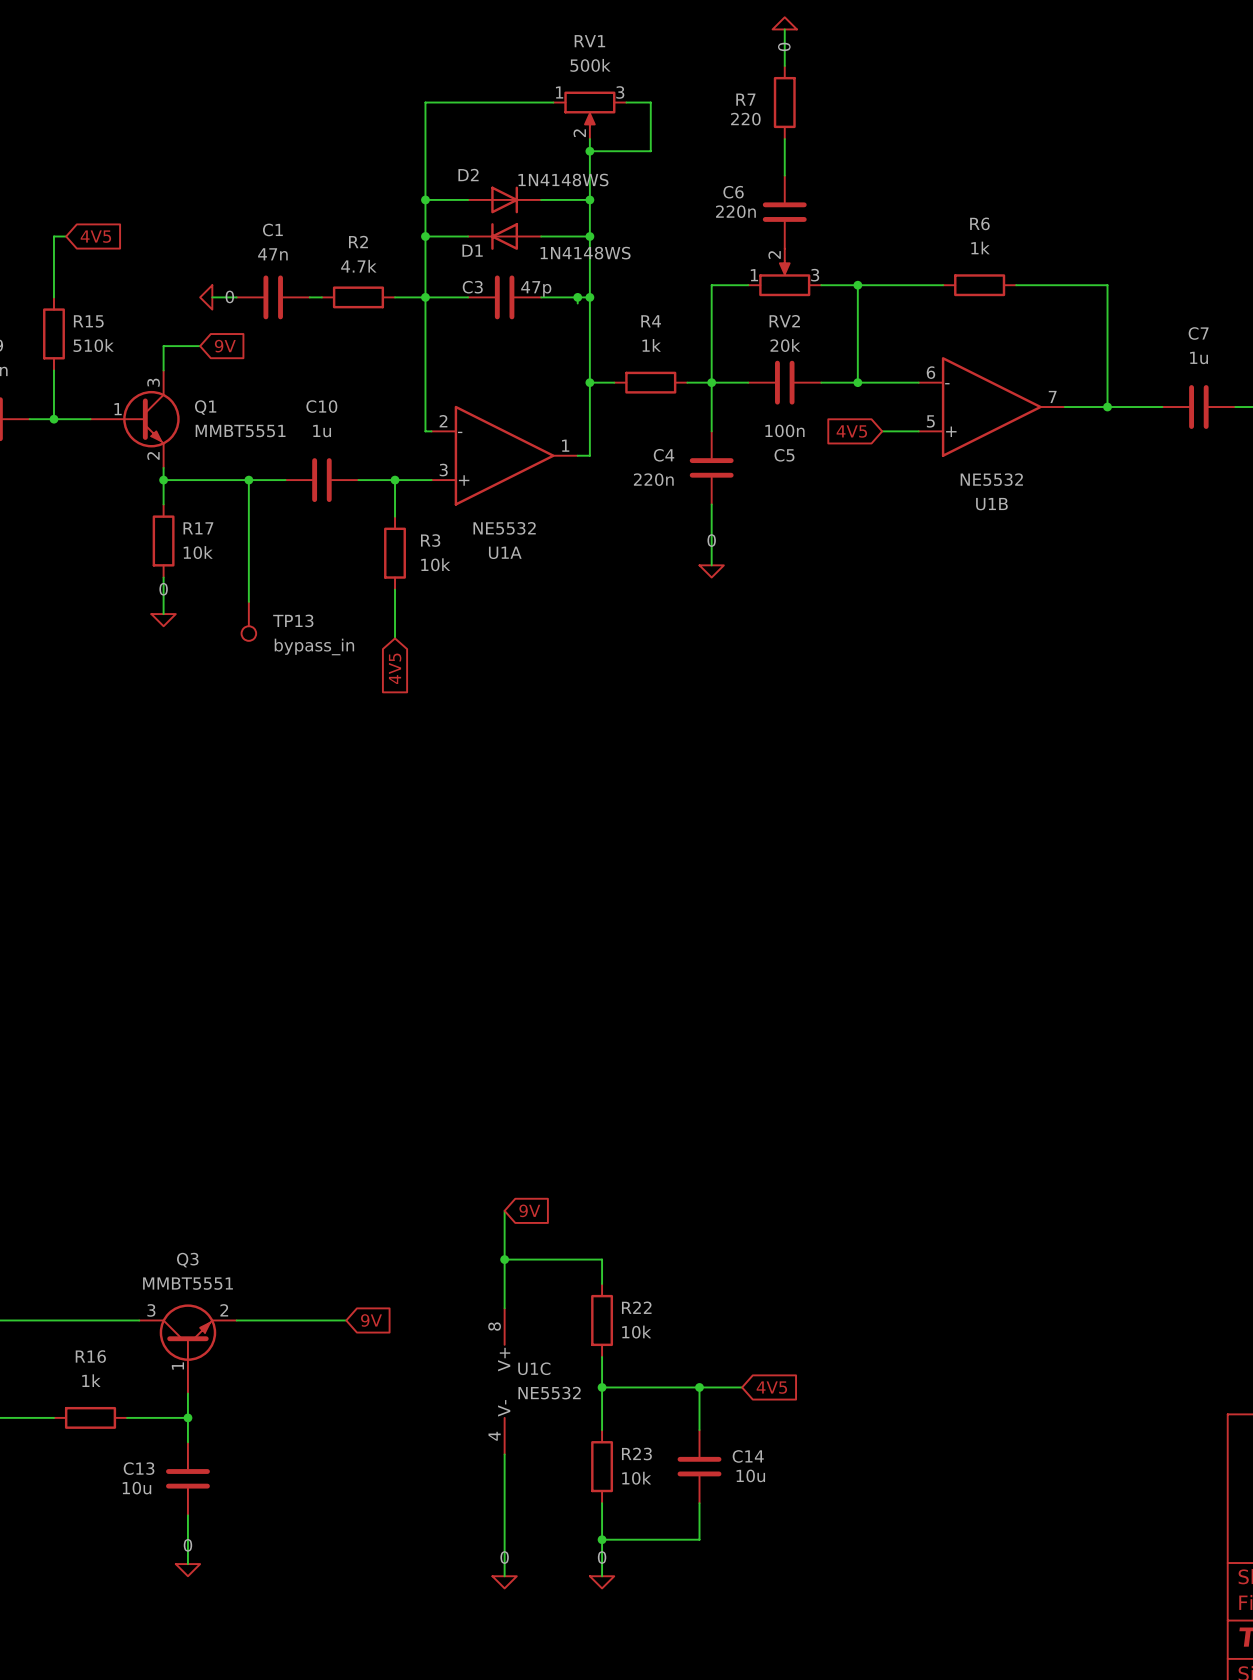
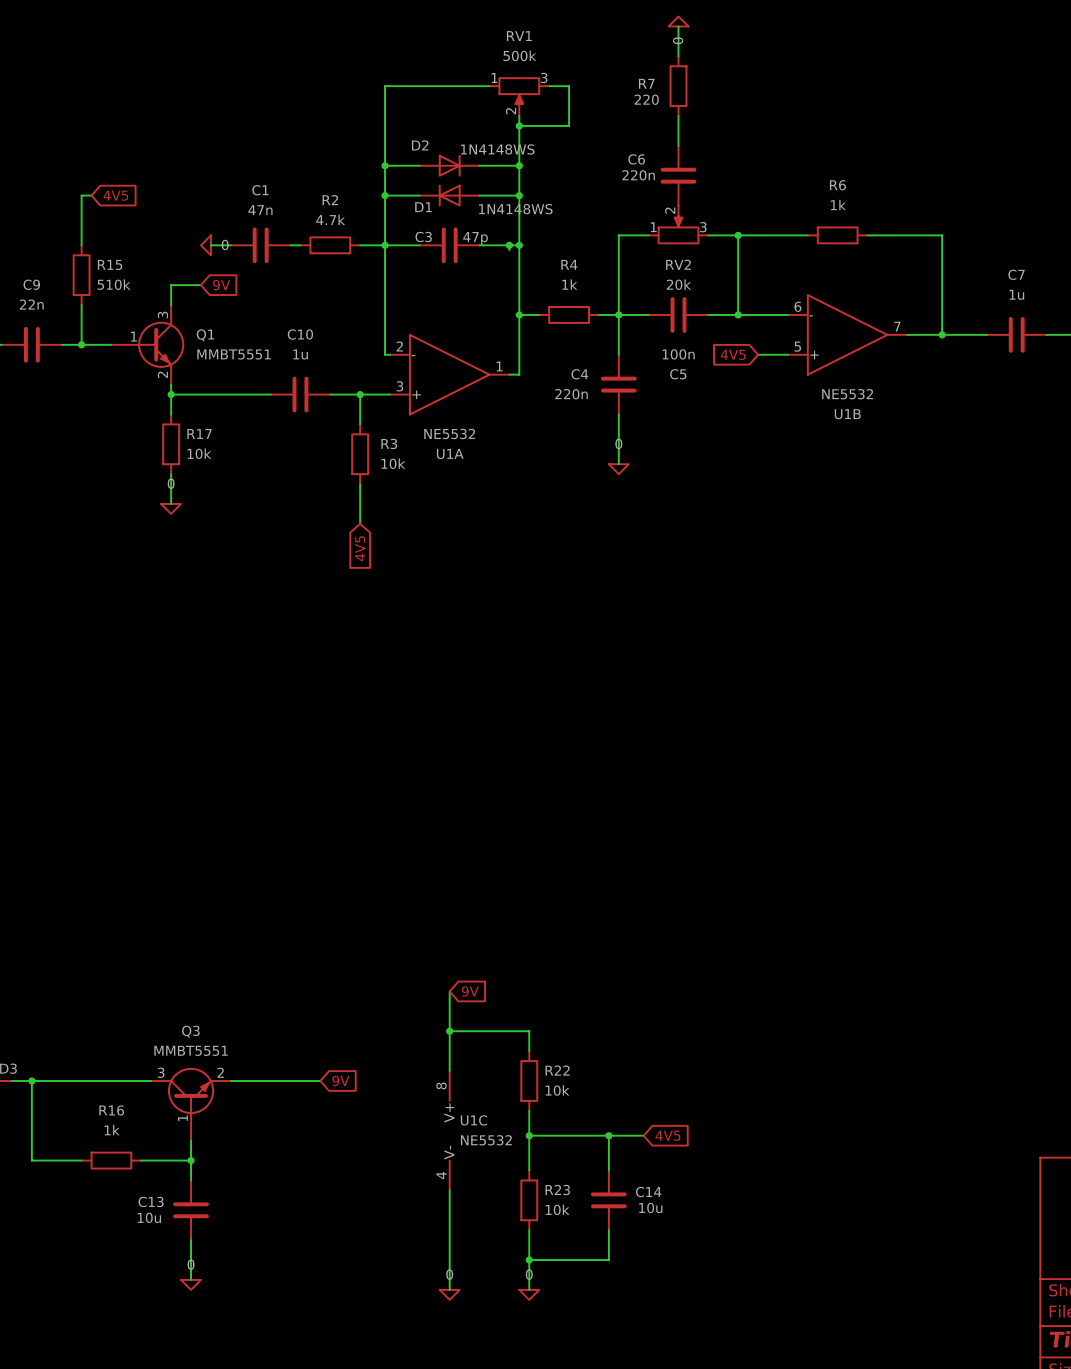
wire: (248, 480) (248, 601) -> none
junction: (248, 480) -> none
TP13: bypass_in (248, 621) -> none

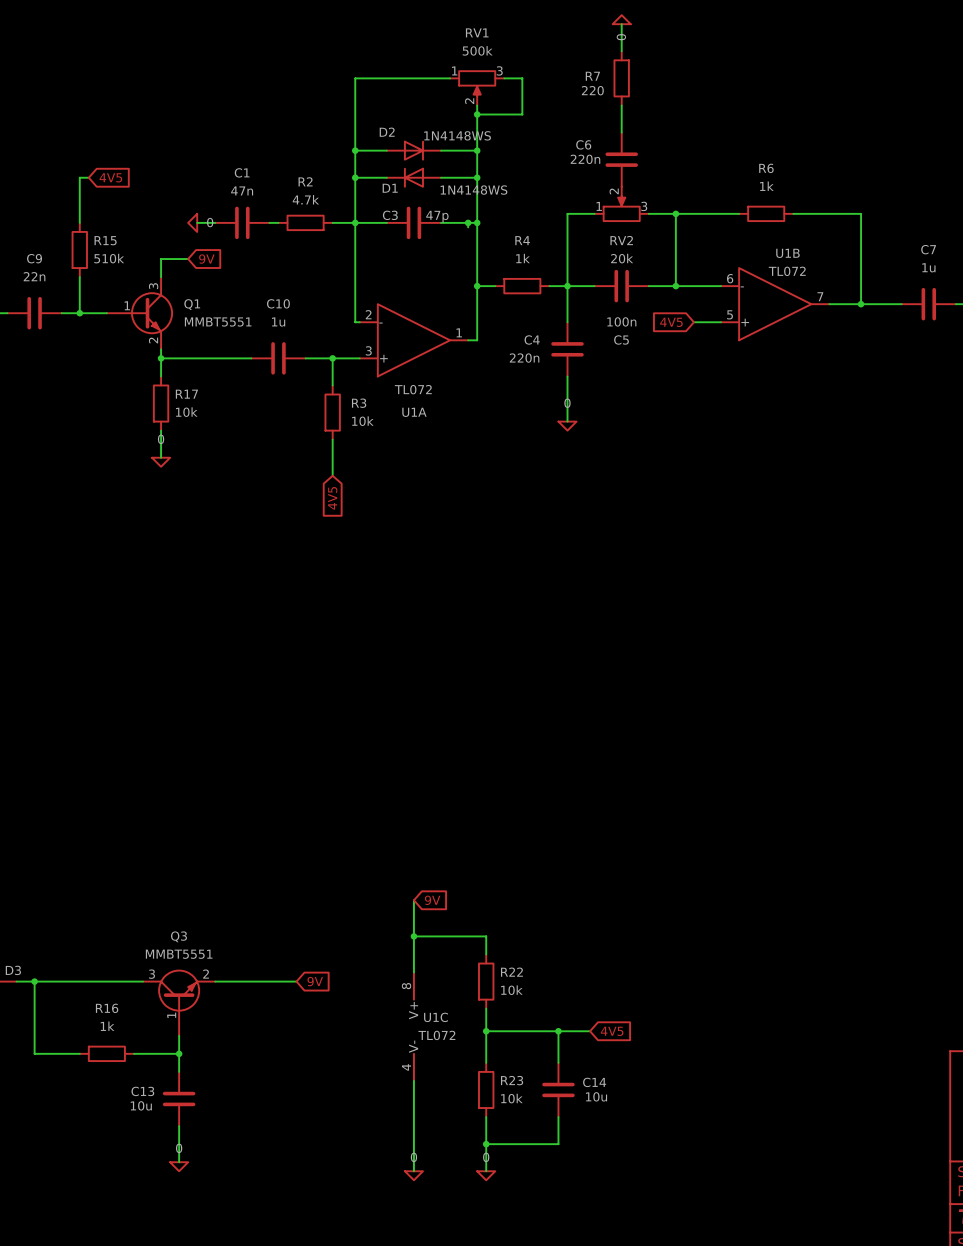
U1B value: NE5532 (847, 394) -> TL072 (787, 271)
U1B name position: U1B (847, 414) -> U1B (787, 253)
U1A value: NE5532 (449, 433) -> TL072 (413, 389)
U1C value: NE5532 (486, 1140) -> TL072 (436, 1035)

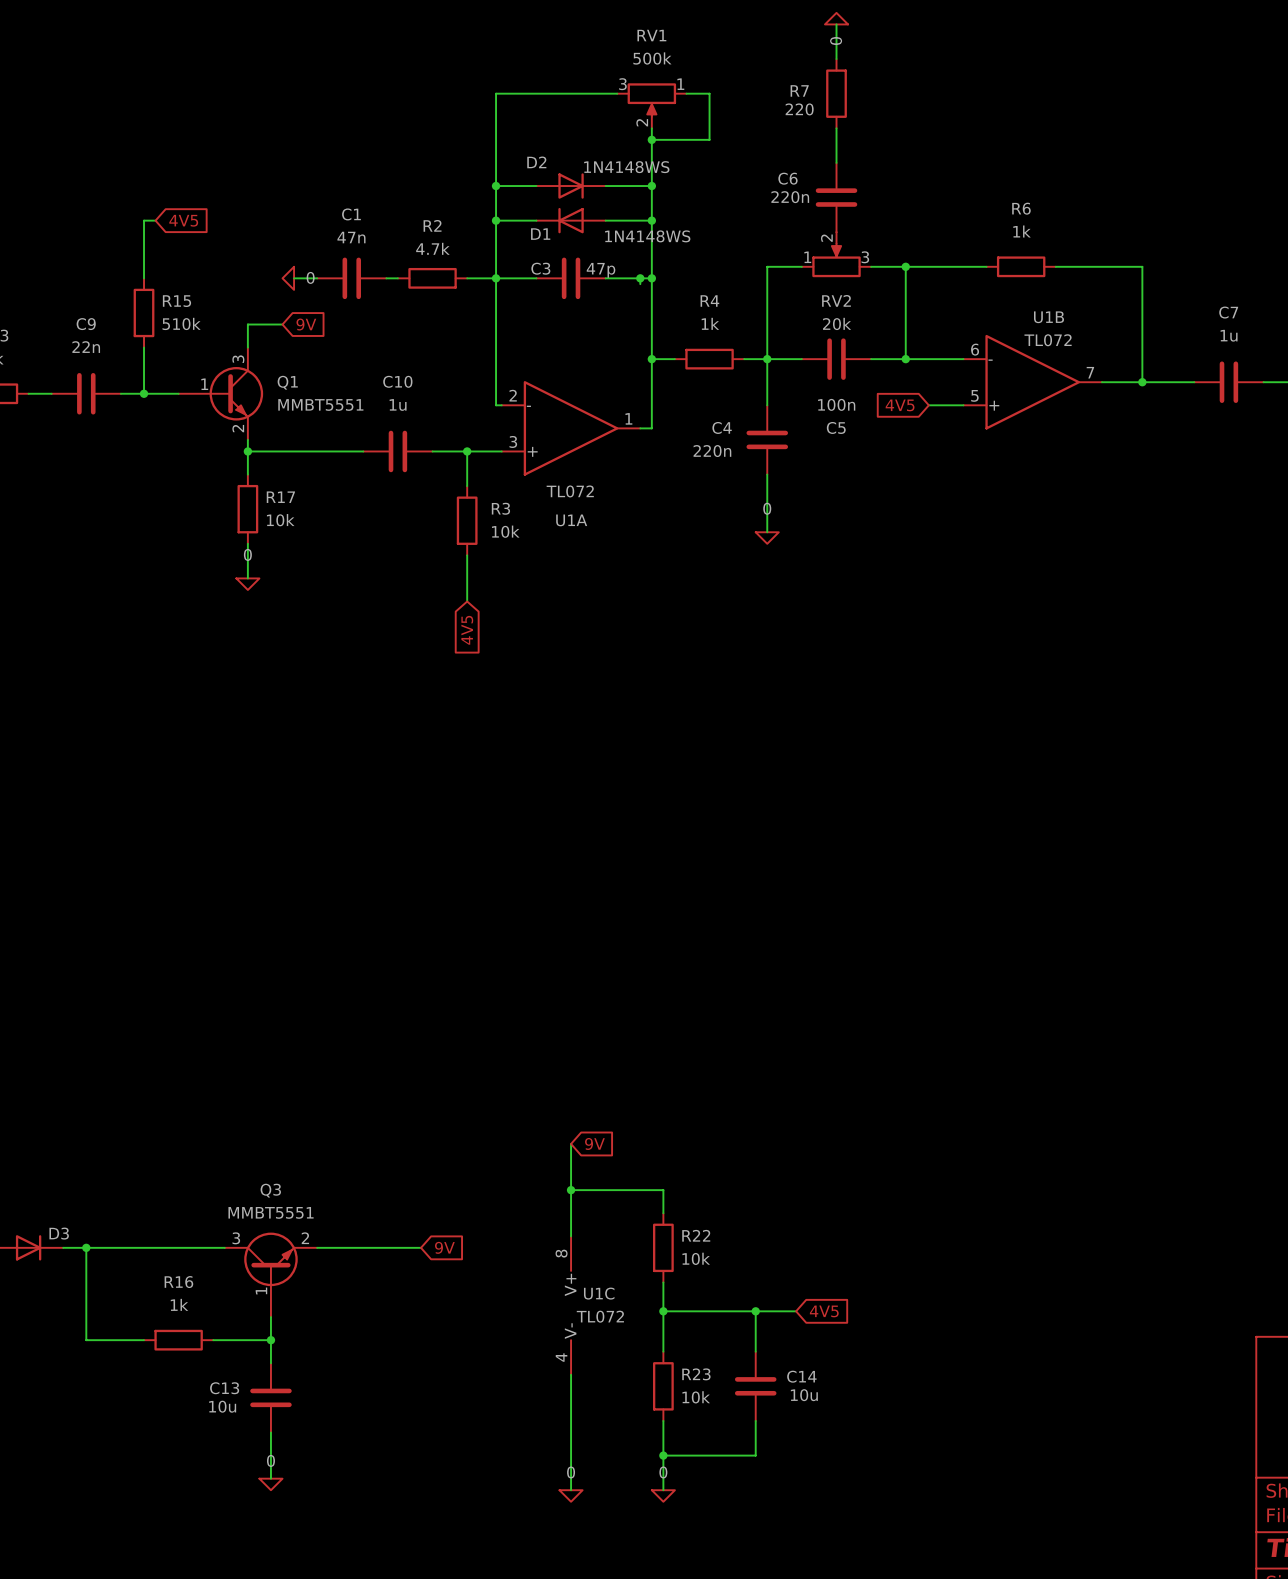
RV1 flip: as is (477, 83) -> left-right (651, 100)

